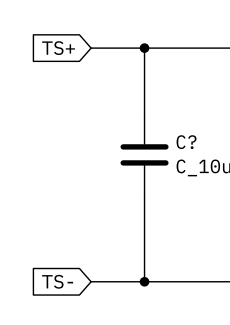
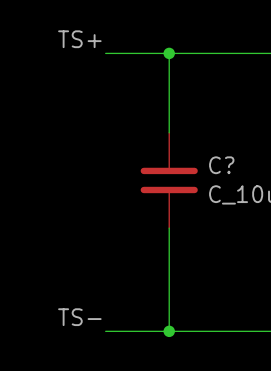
label: none -> TS+ (79, 39)
global label: TS+ (58, 48) -> none
label: none -> TS- (79, 317)
global label: TS- (57, 281) -> none

